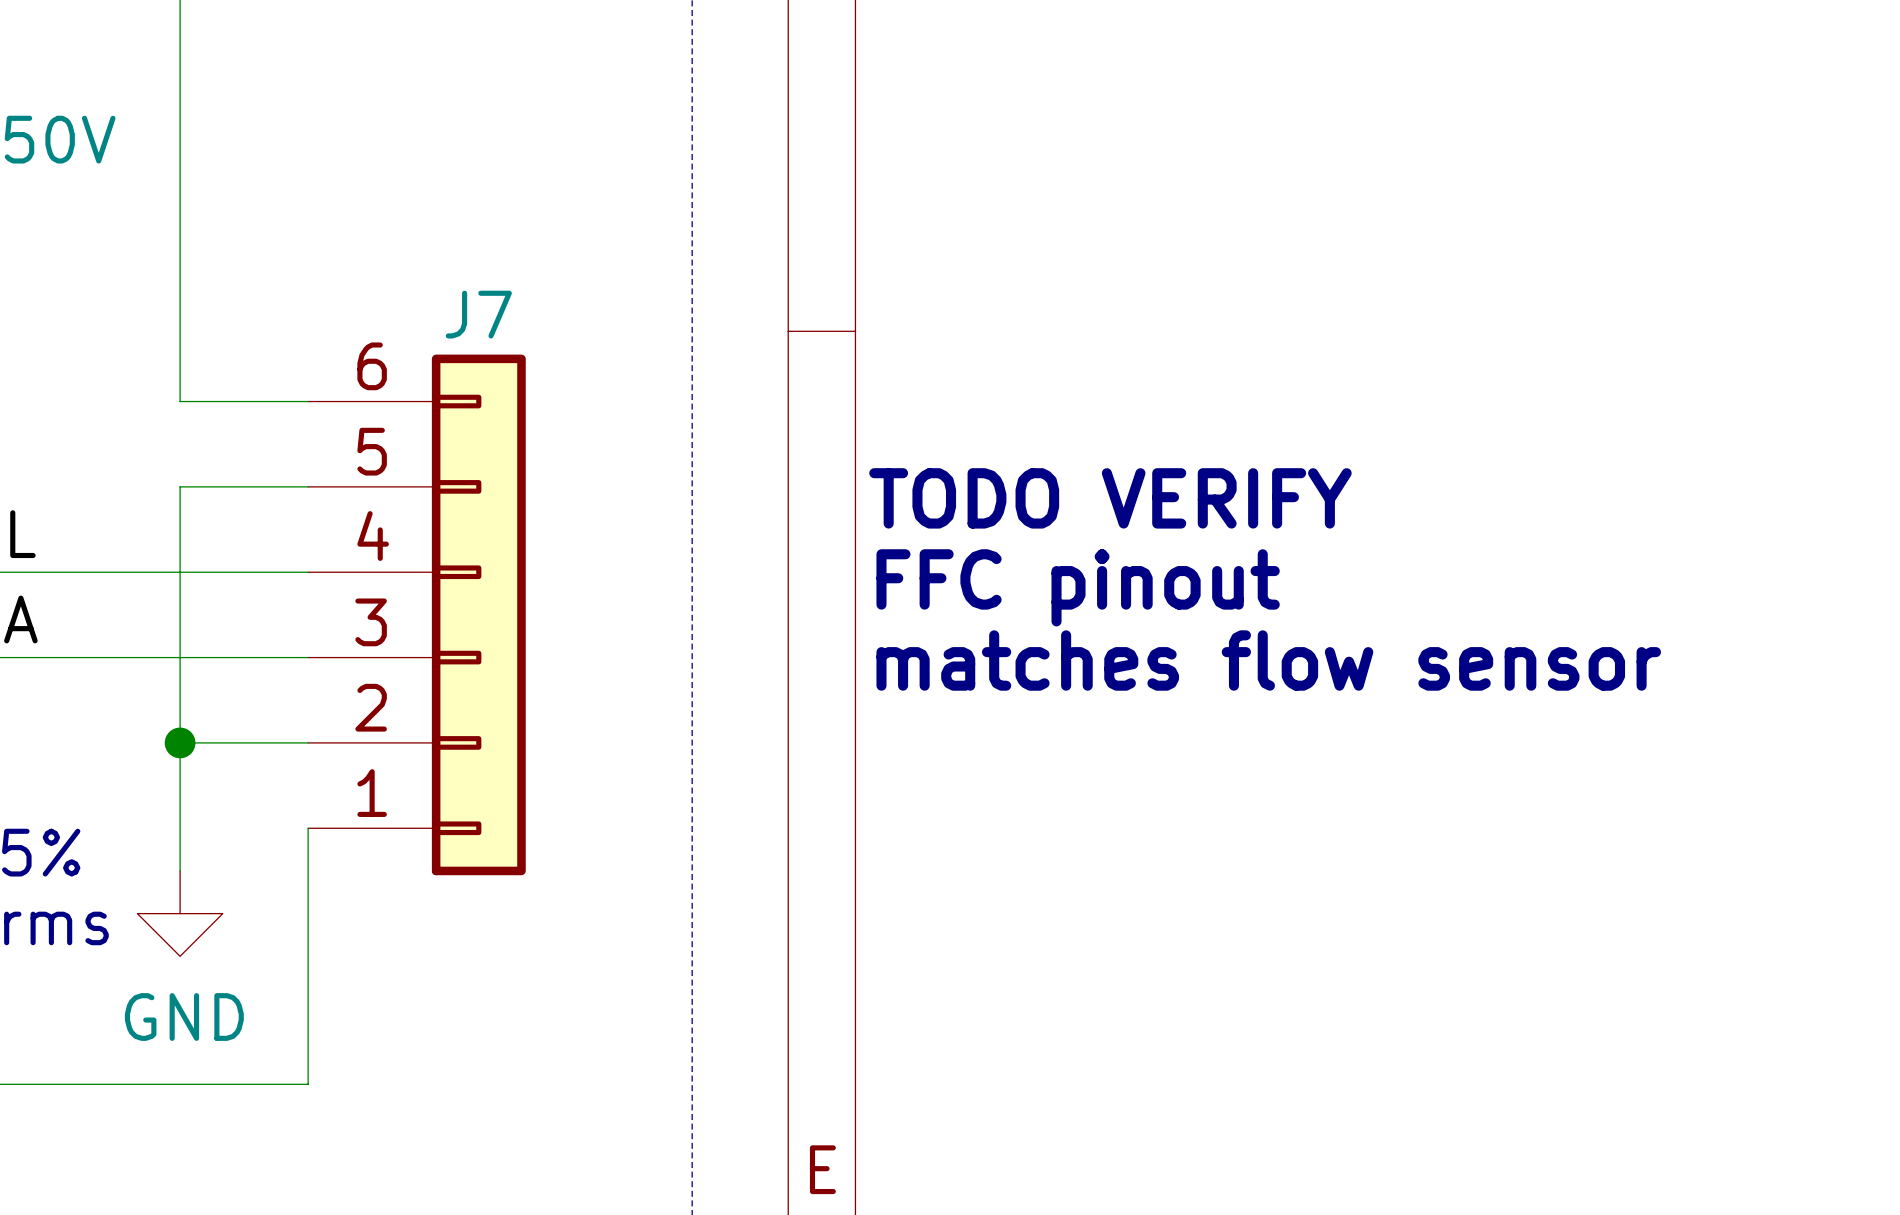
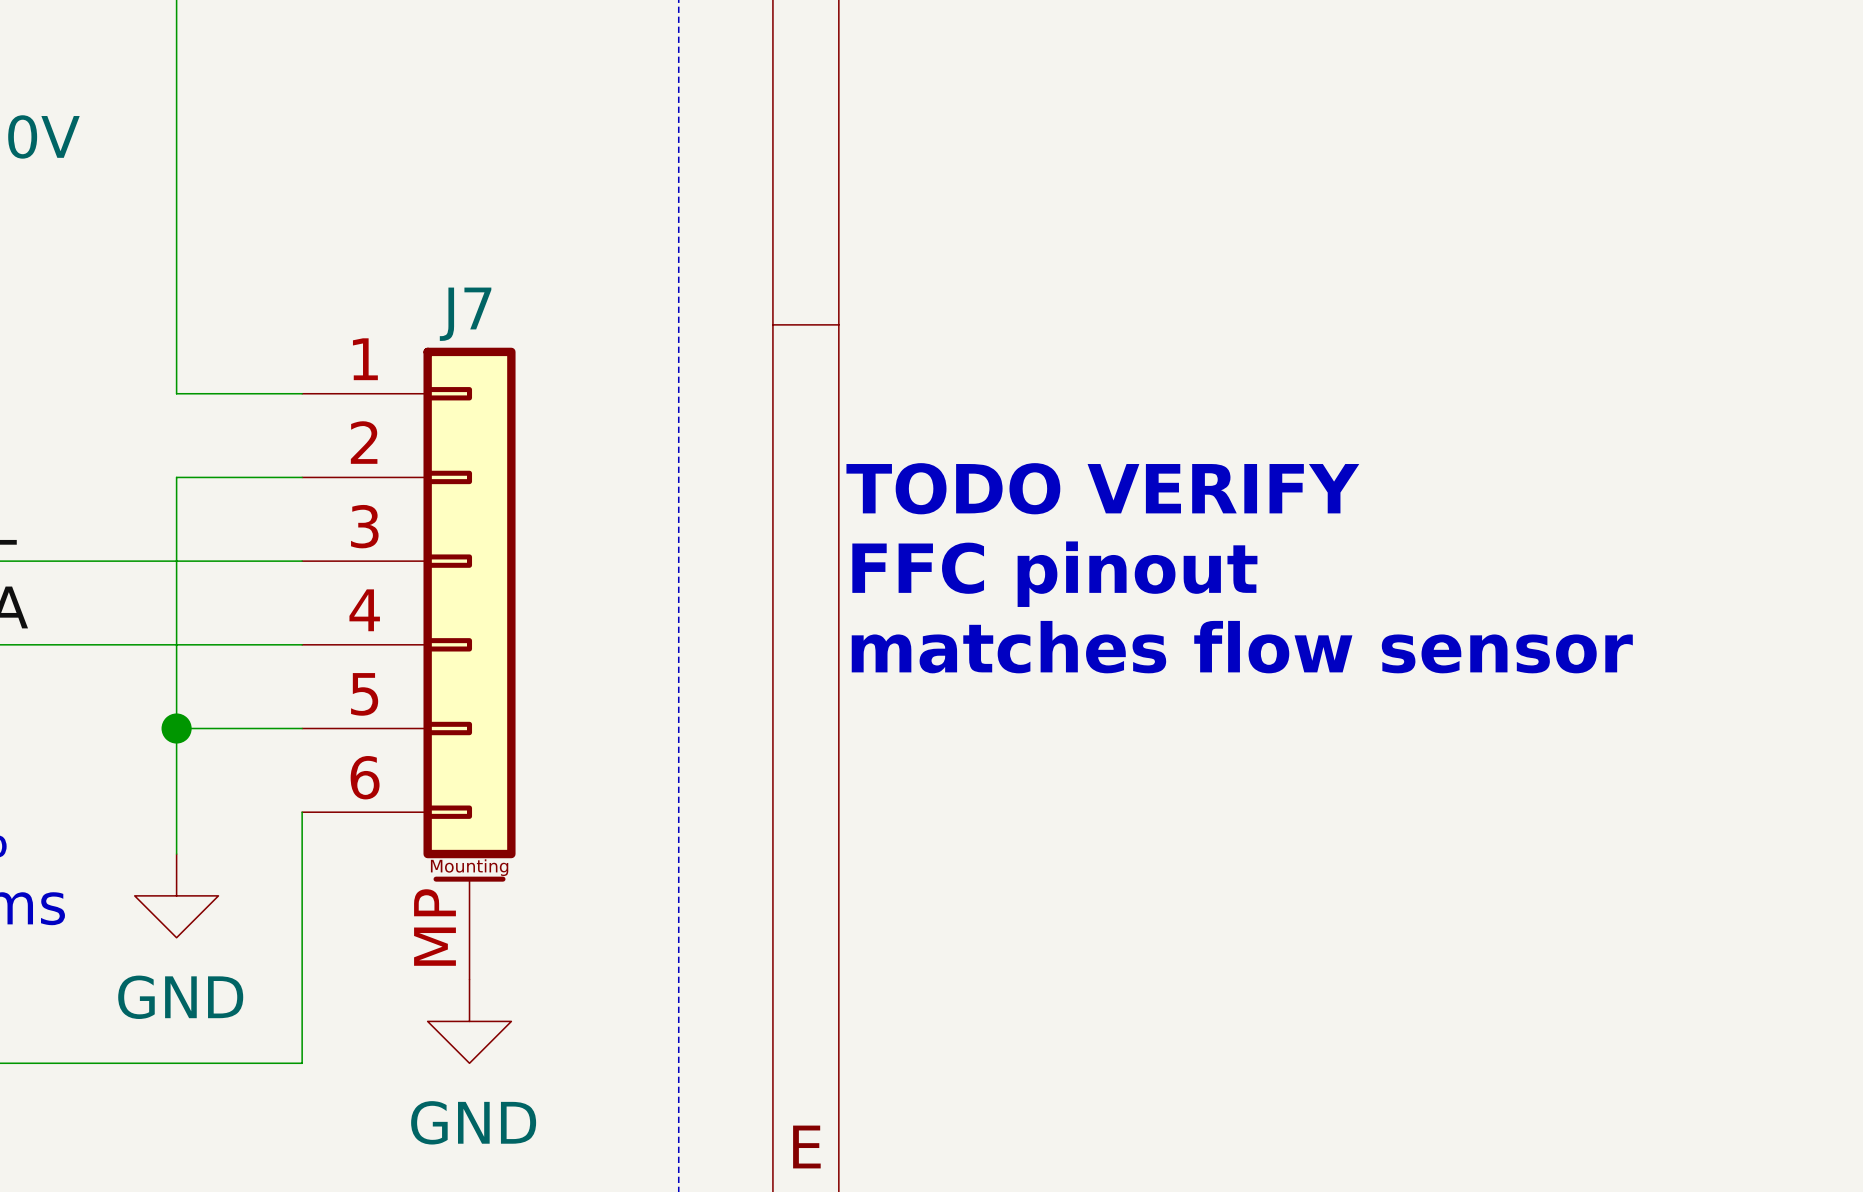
J7 symbol: [308, 354, 526, 876] -> [302, 347, 516, 980]
power symbol: none -> GND (469, 1021)

